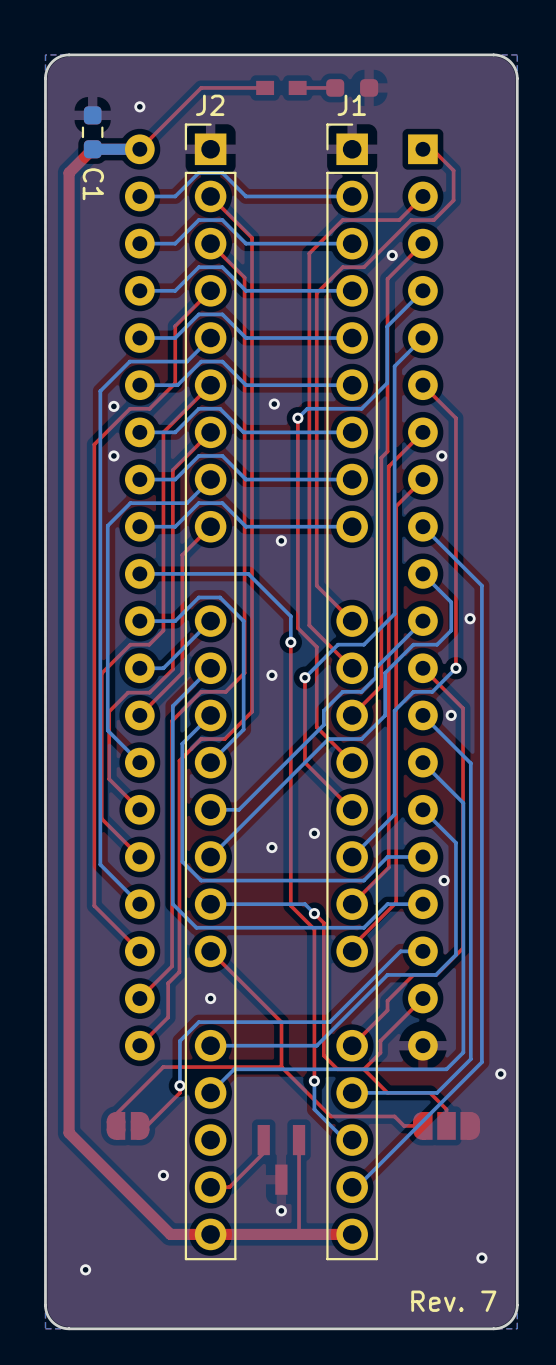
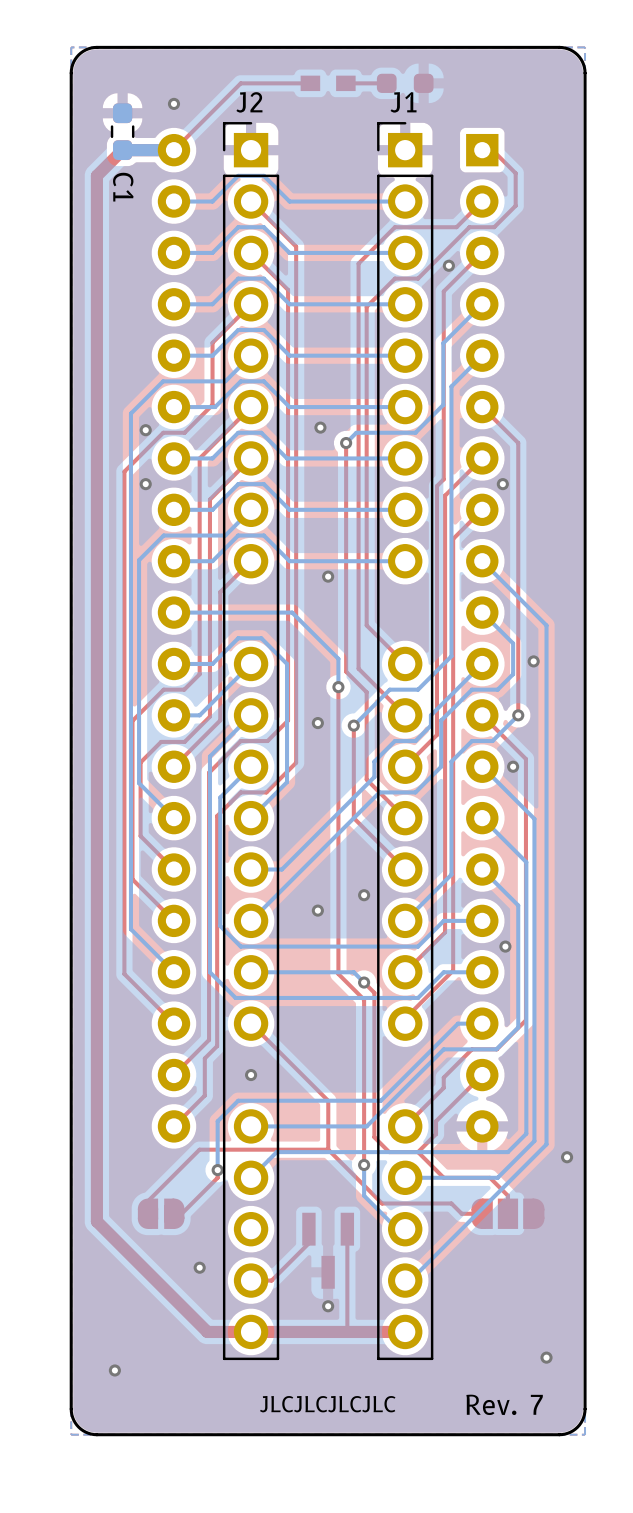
text: none -> JLCJLCJLCJLC (327, 1404)

